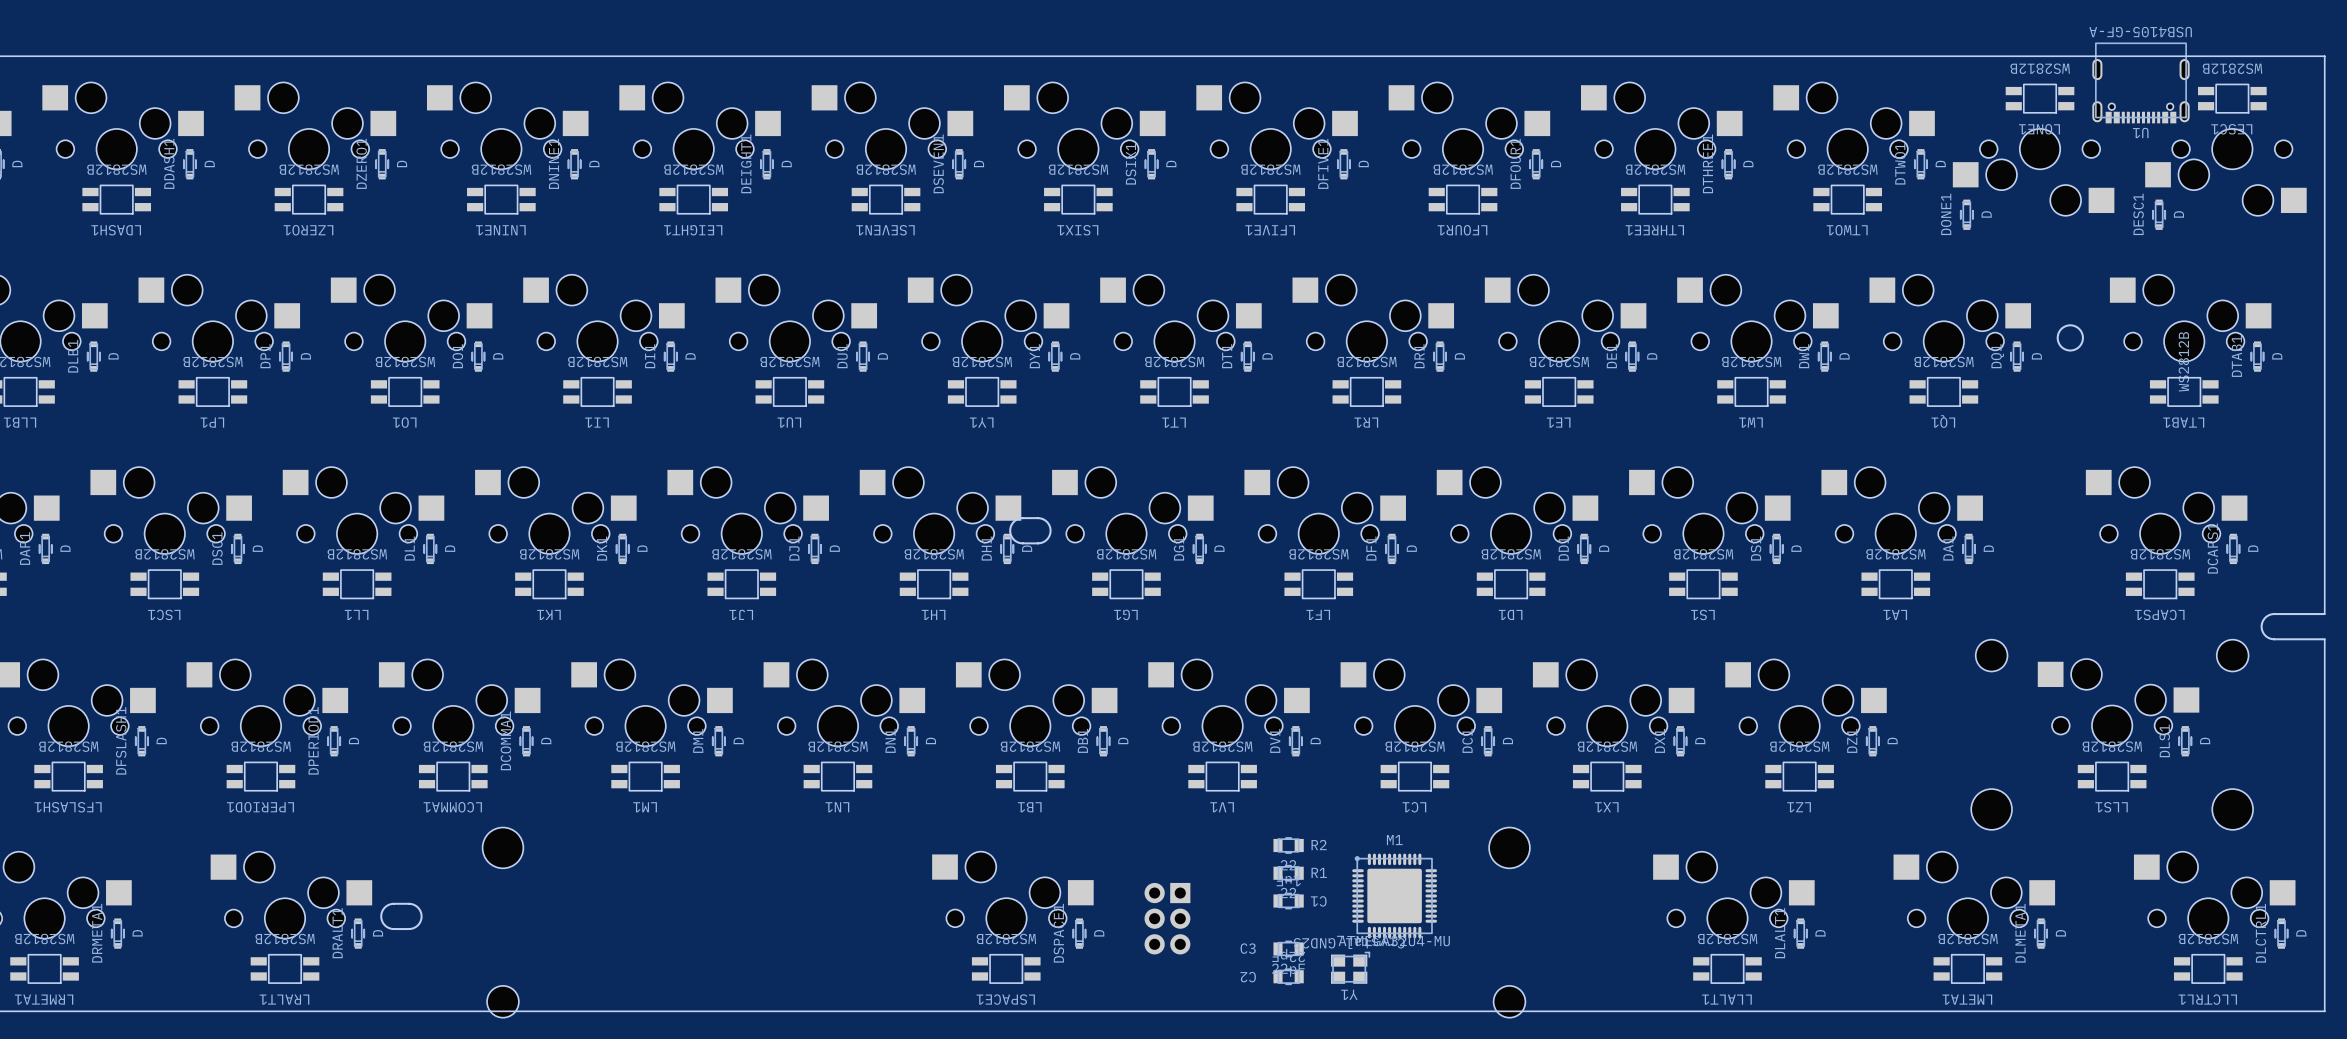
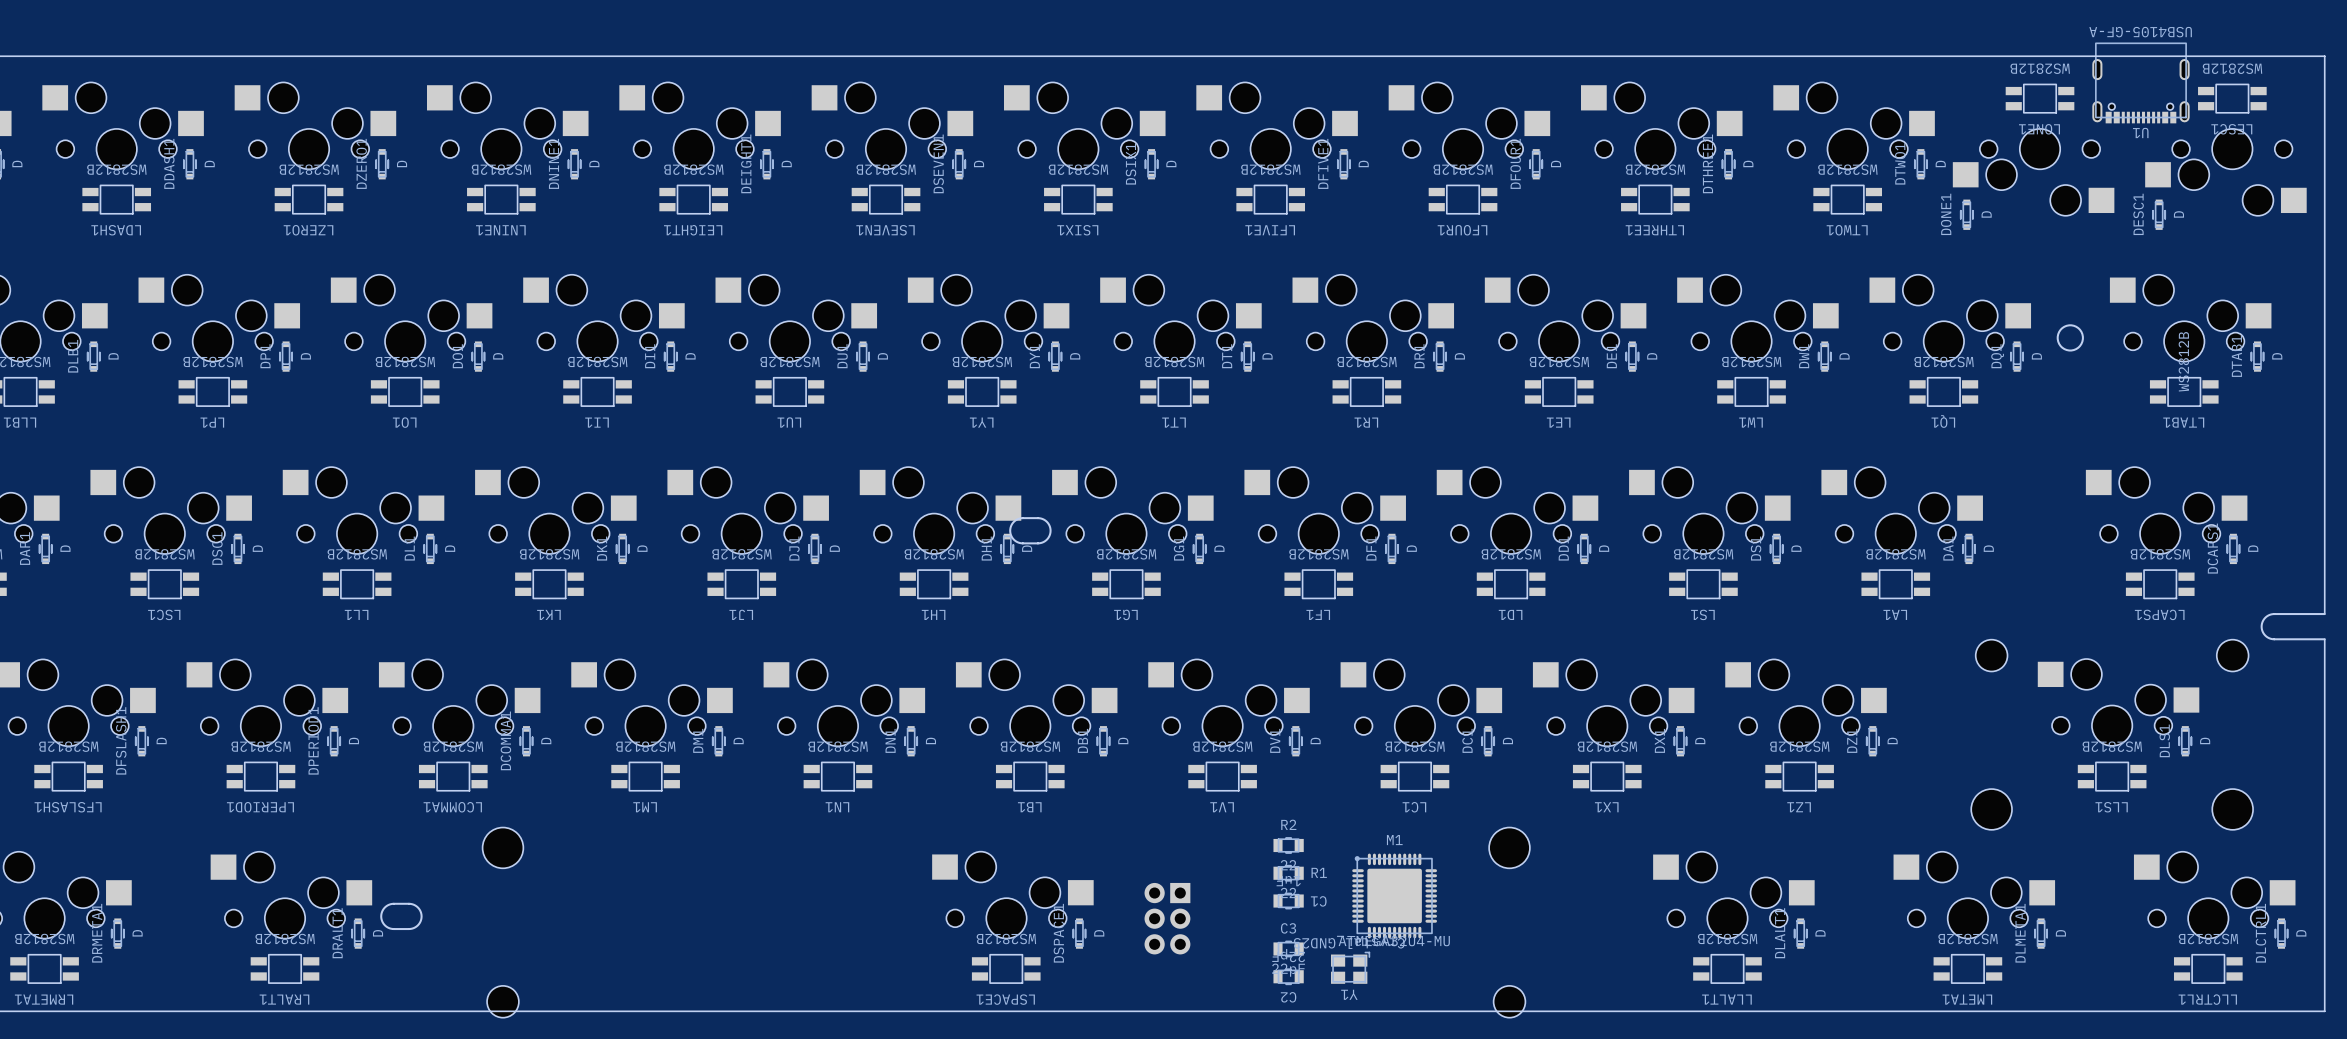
R2 name position: R2 (1319, 845) -> R2 (1288, 824)
C3 name position: C3 (1248, 948) -> C3 (1288, 928)
C2 name position: C2 (1248, 977) -> C2 (1288, 997)

